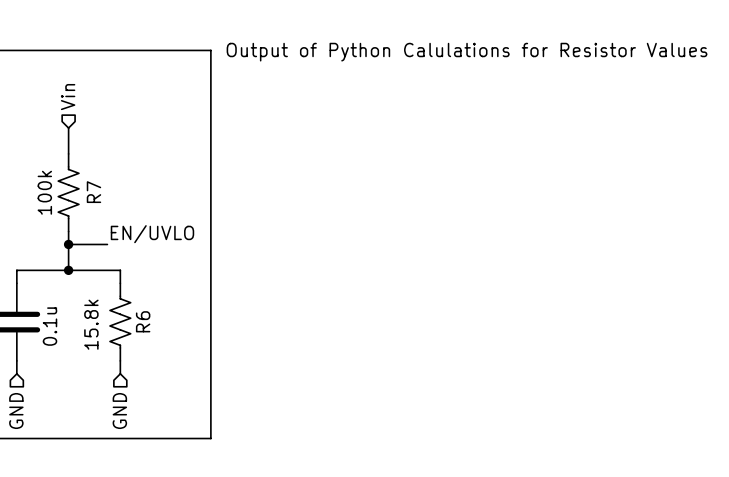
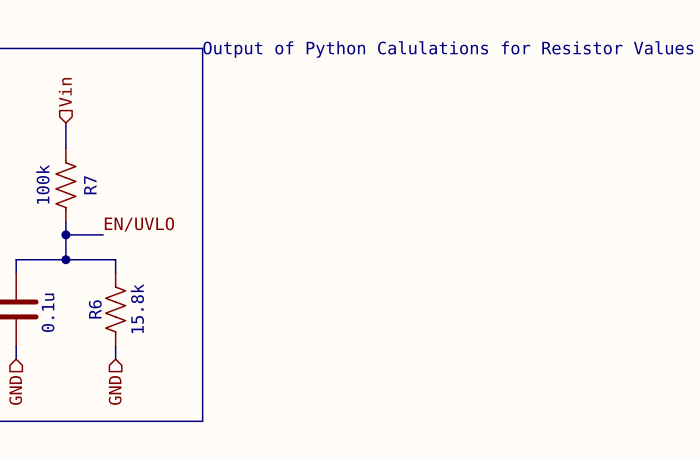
R6 name position: R6 (143, 321) -> R6 (95, 309)
R6 value position: 15.8k (91, 324) -> 15.8k (137, 308)

